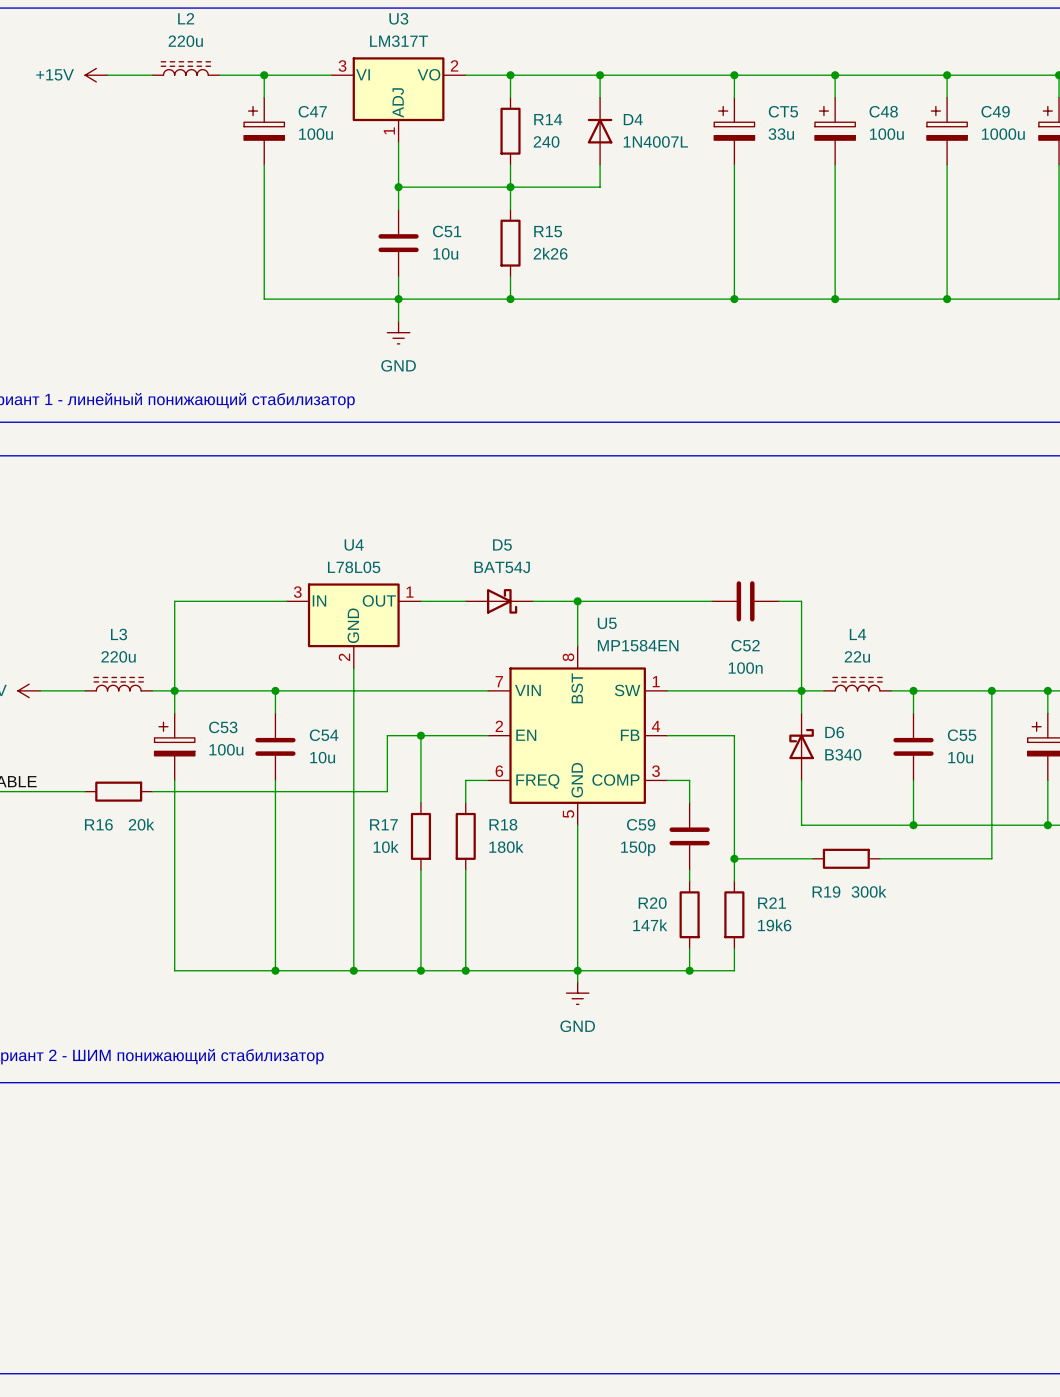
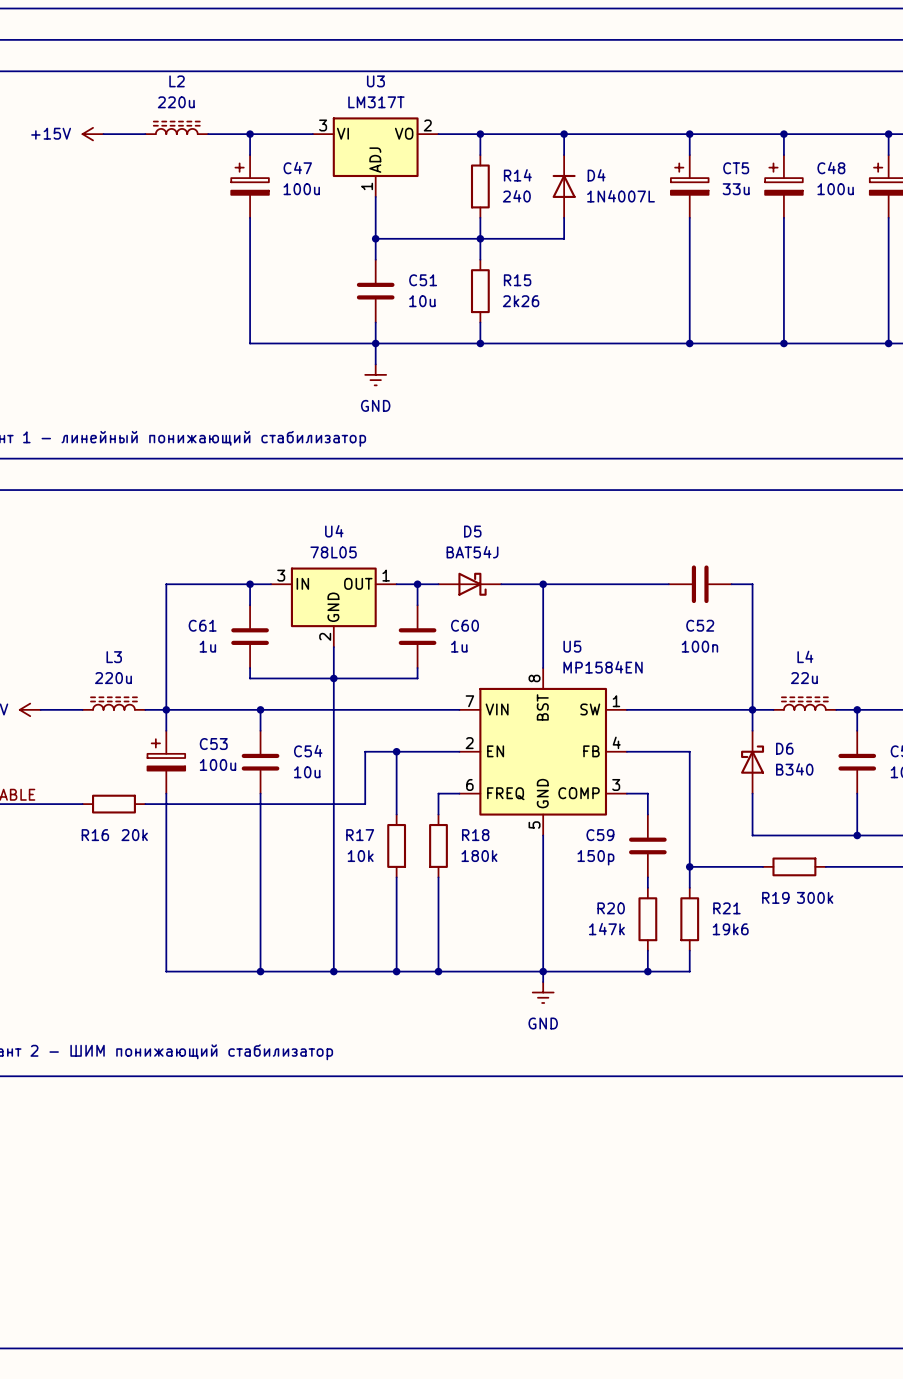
wire: none -> (250, 584) (250, 605)
junction: none -> (250, 584)
wire: none -> (417, 584) (417, 605)
junction: none -> (417, 584)
wire: none -> (543, 584) (543, 626)
U4 value: L78L05 (354, 567) -> 78L05 (333, 552)
wire: (174, 601) (286, 601) -> (166, 626) (166, 584) (271, 584)
wire: (420, 601) (465, 601) -> (396, 584) (438, 584)
D5 position: (499, 601) -> (469, 584)
wire: (532, 601) (712, 601) -> (501, 584) (668, 584)
junction position: (577, 601) -> (543, 584)
C52 position: (745, 601) -> (700, 584)
wire: (779, 601) (801, 601) -> (731, 584) (752, 584) (752, 626)
C61: none -> 1u (250, 636)
C60: none -> 1u (417, 636)
U4 position: (353, 625) -> (333, 607)
wire: none -> (250, 668) (250, 678) (417, 678) (417, 668)
junction: none -> (333, 678)

